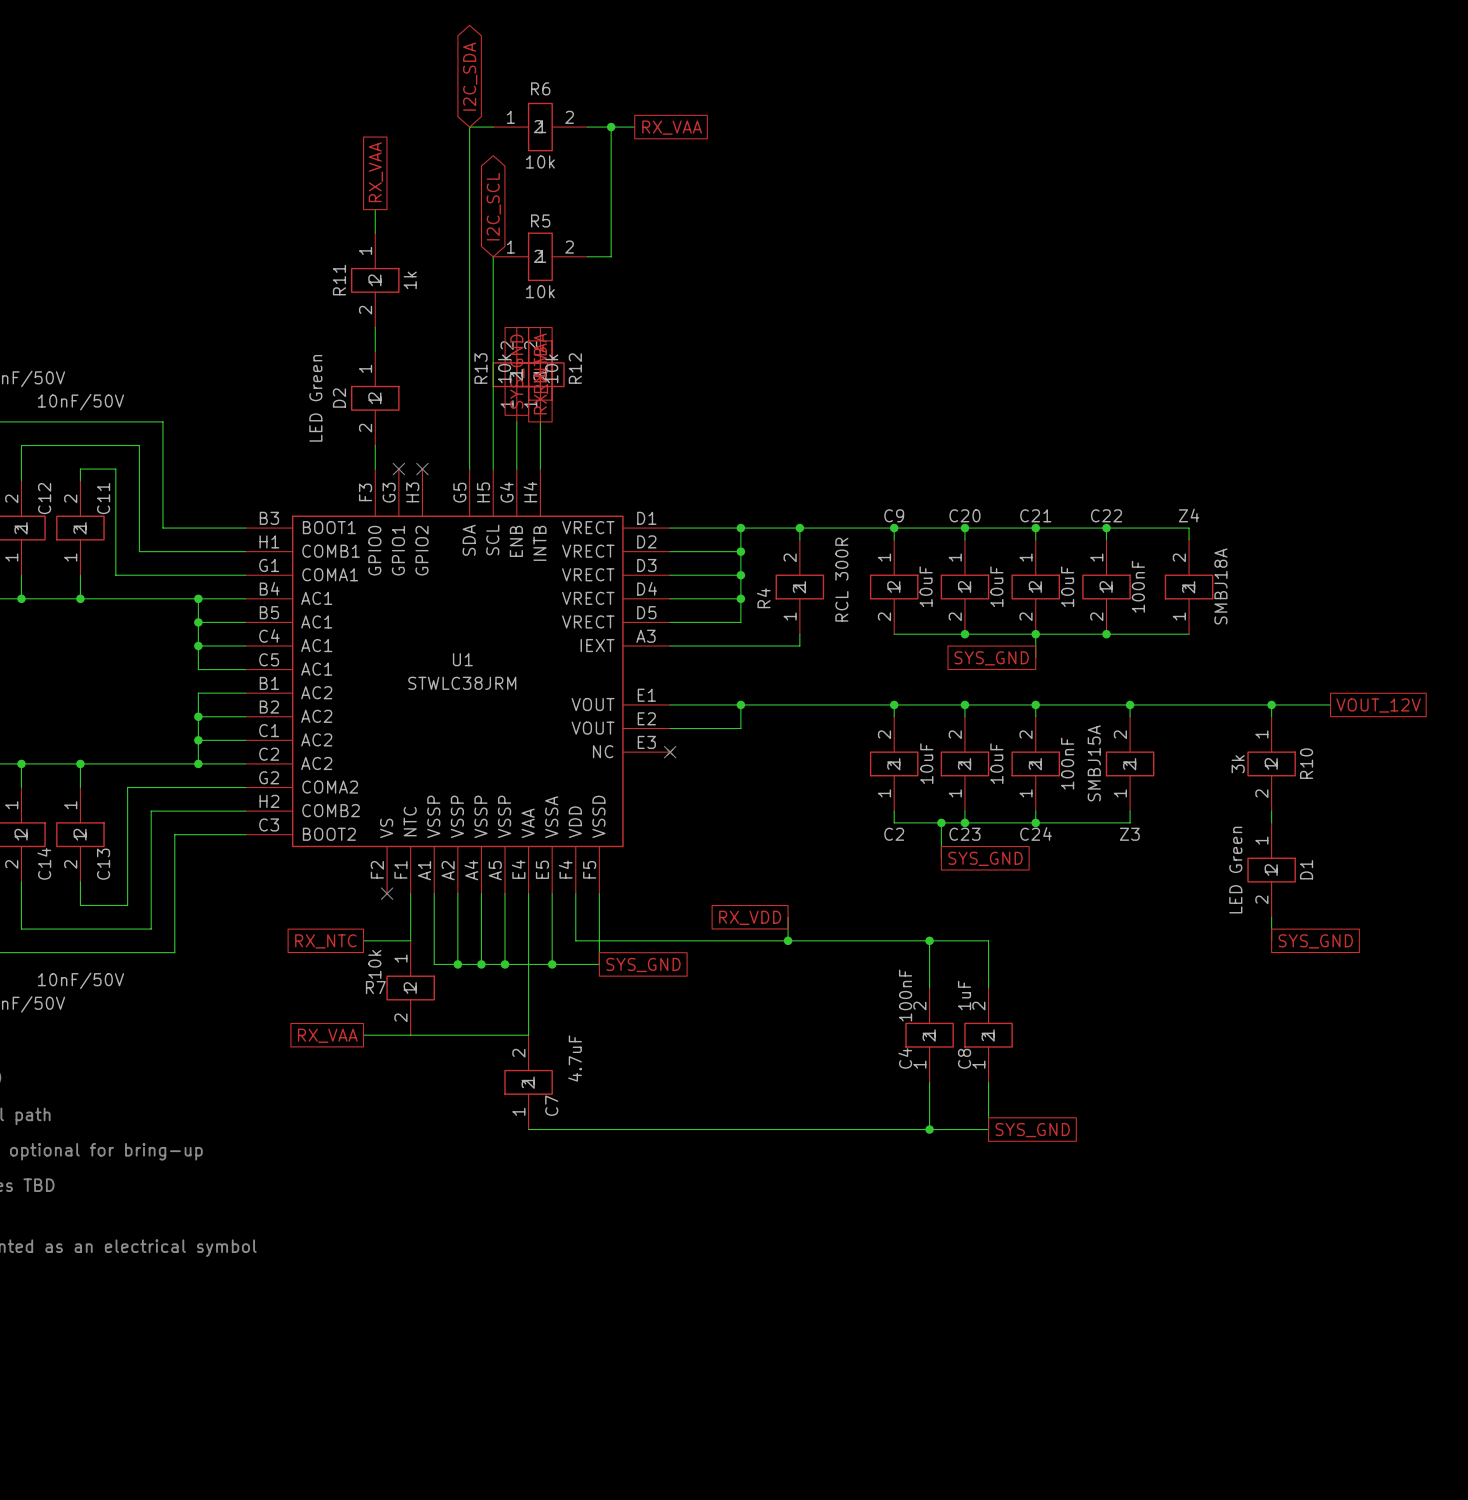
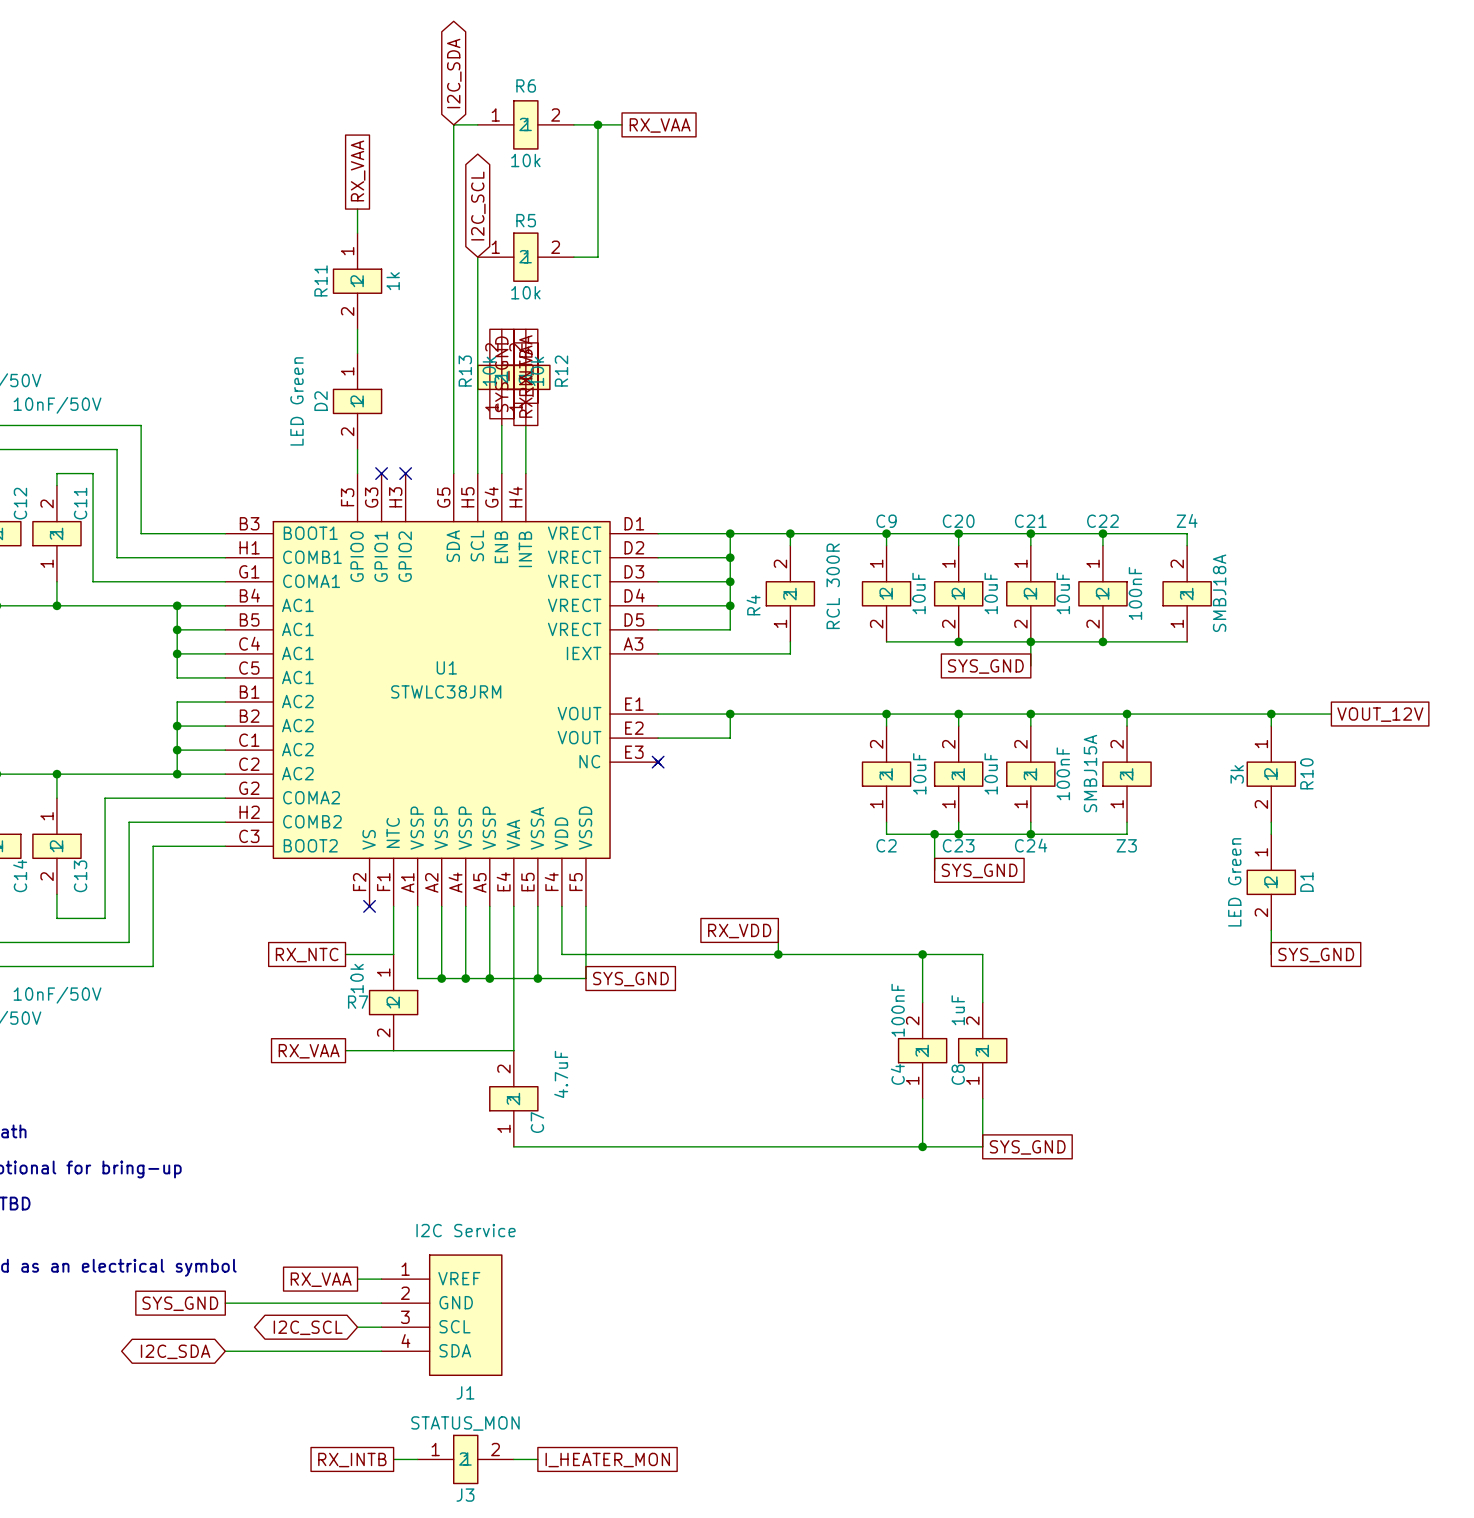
global label: none -> RX_VAA (321, 1279)
wire: none -> (357, 1279) (381, 1279)
wire: none -> (225, 1303) (381, 1303)
global label: none -> SYS_GND (180, 1303)
J1: none -> I2C Service (442, 1315)
wire: none -> (357, 1327) (381, 1327)
global label: none -> I2C_SCL (308, 1327)
global label: none -> I2C_SDA (175, 1351)
wire: none -> (225, 1351) (381, 1351)
global label: none -> RX_INTB (352, 1460)
wire: none -> (393, 1459) (417, 1459)
J3: none -> STATUS_MON (465, 1459)
wire: none -> (513, 1459) (537, 1459)
global label: none -> I_HEATER_MON (607, 1460)

